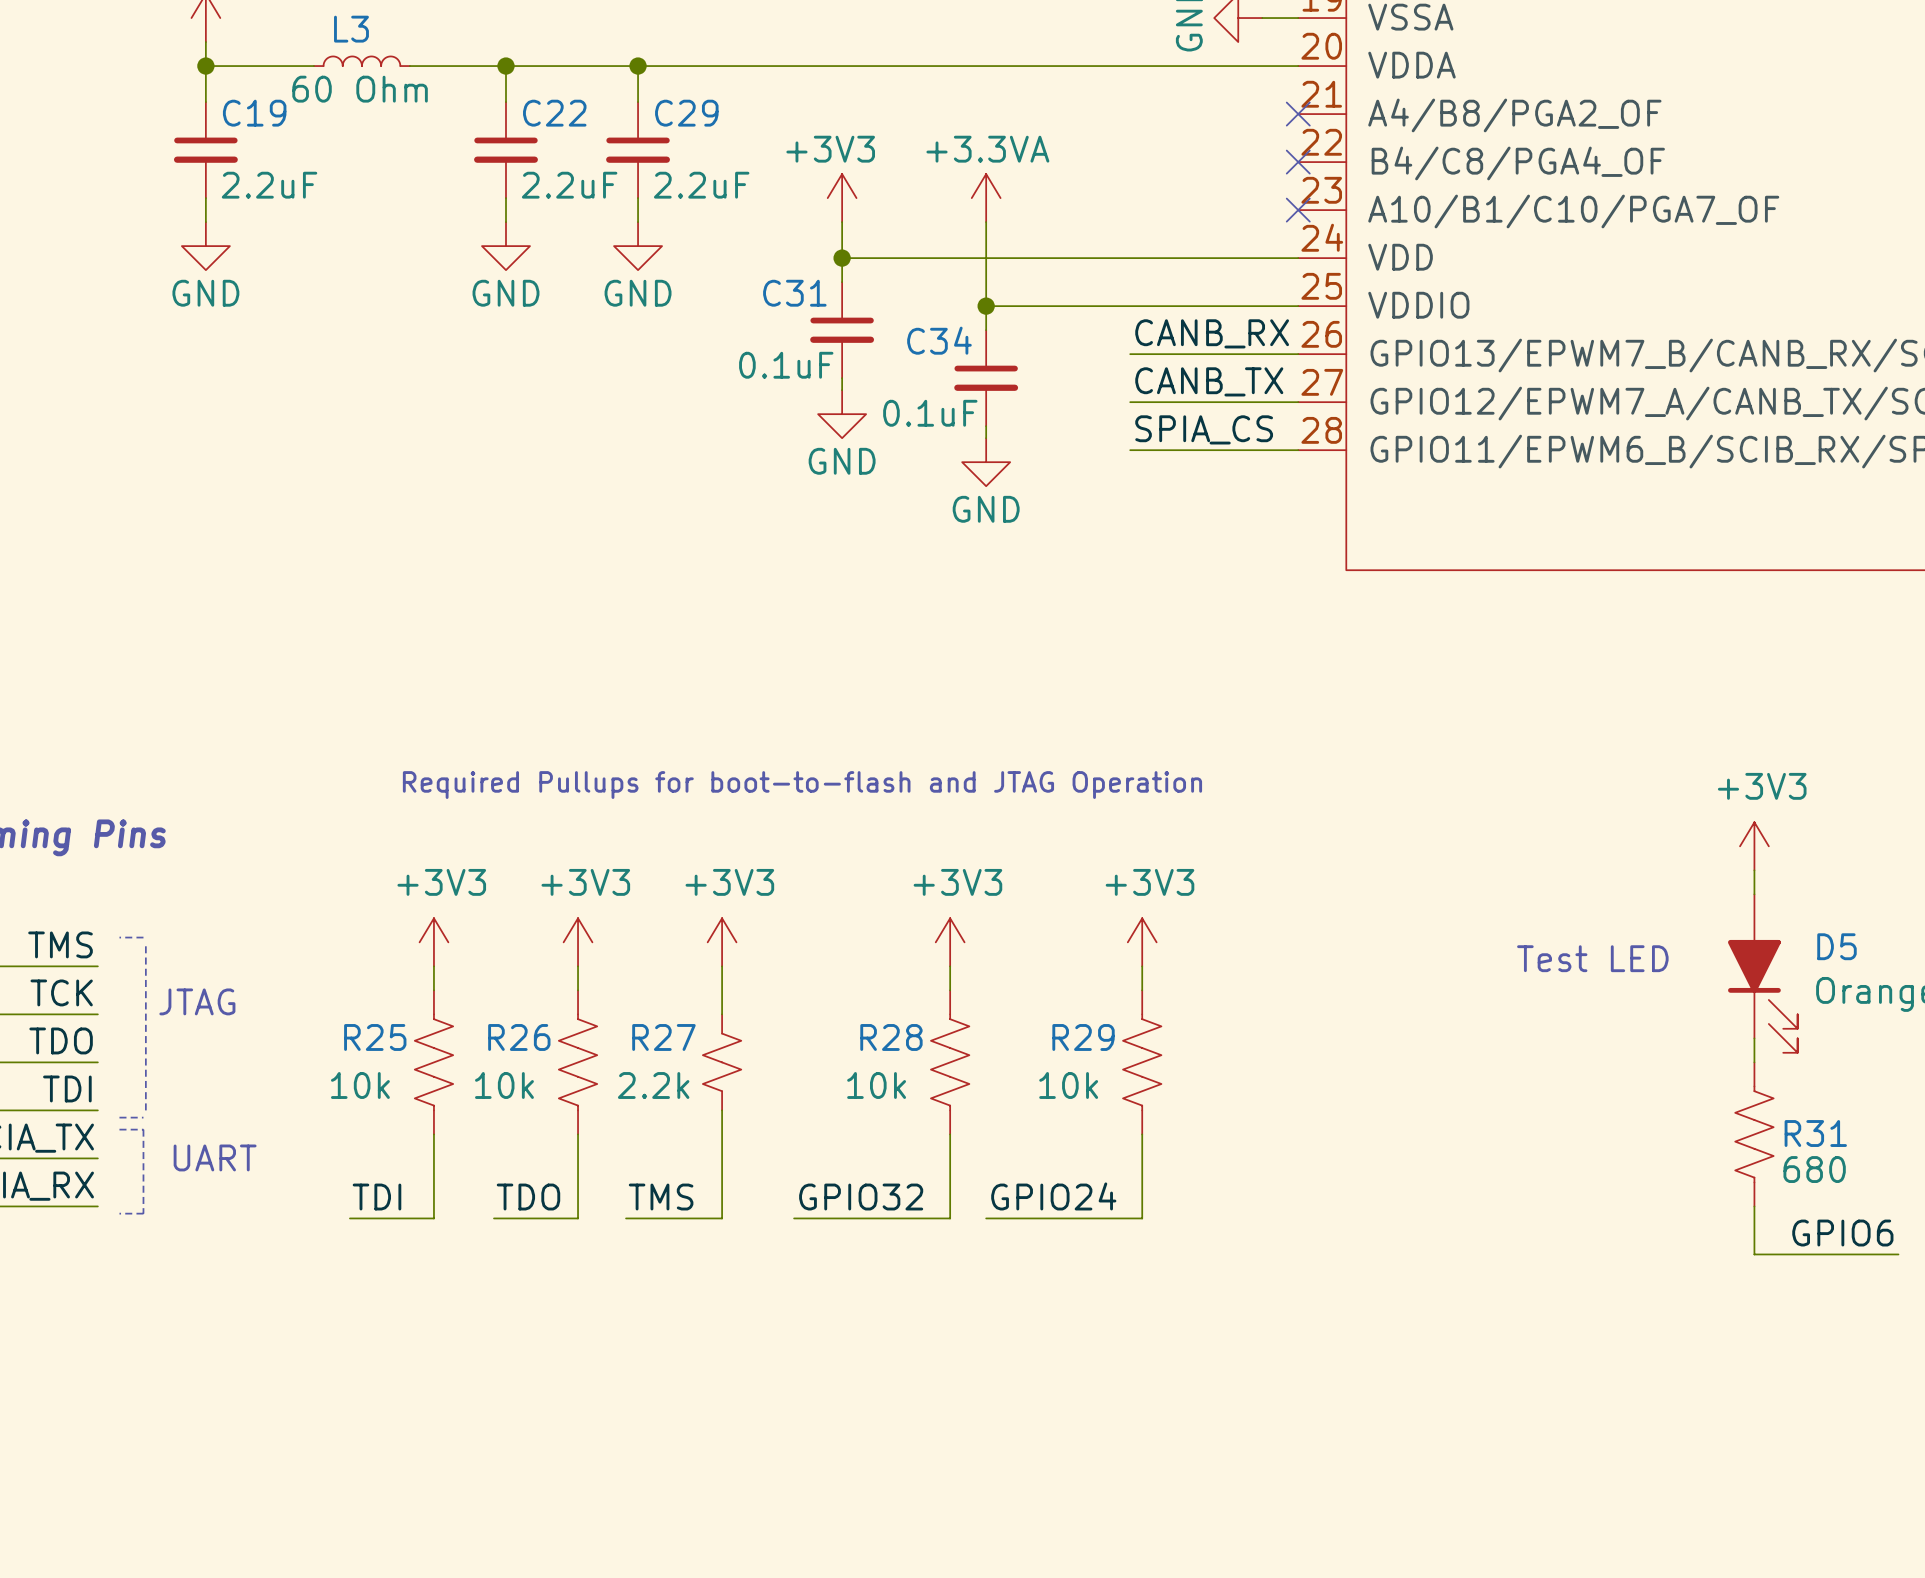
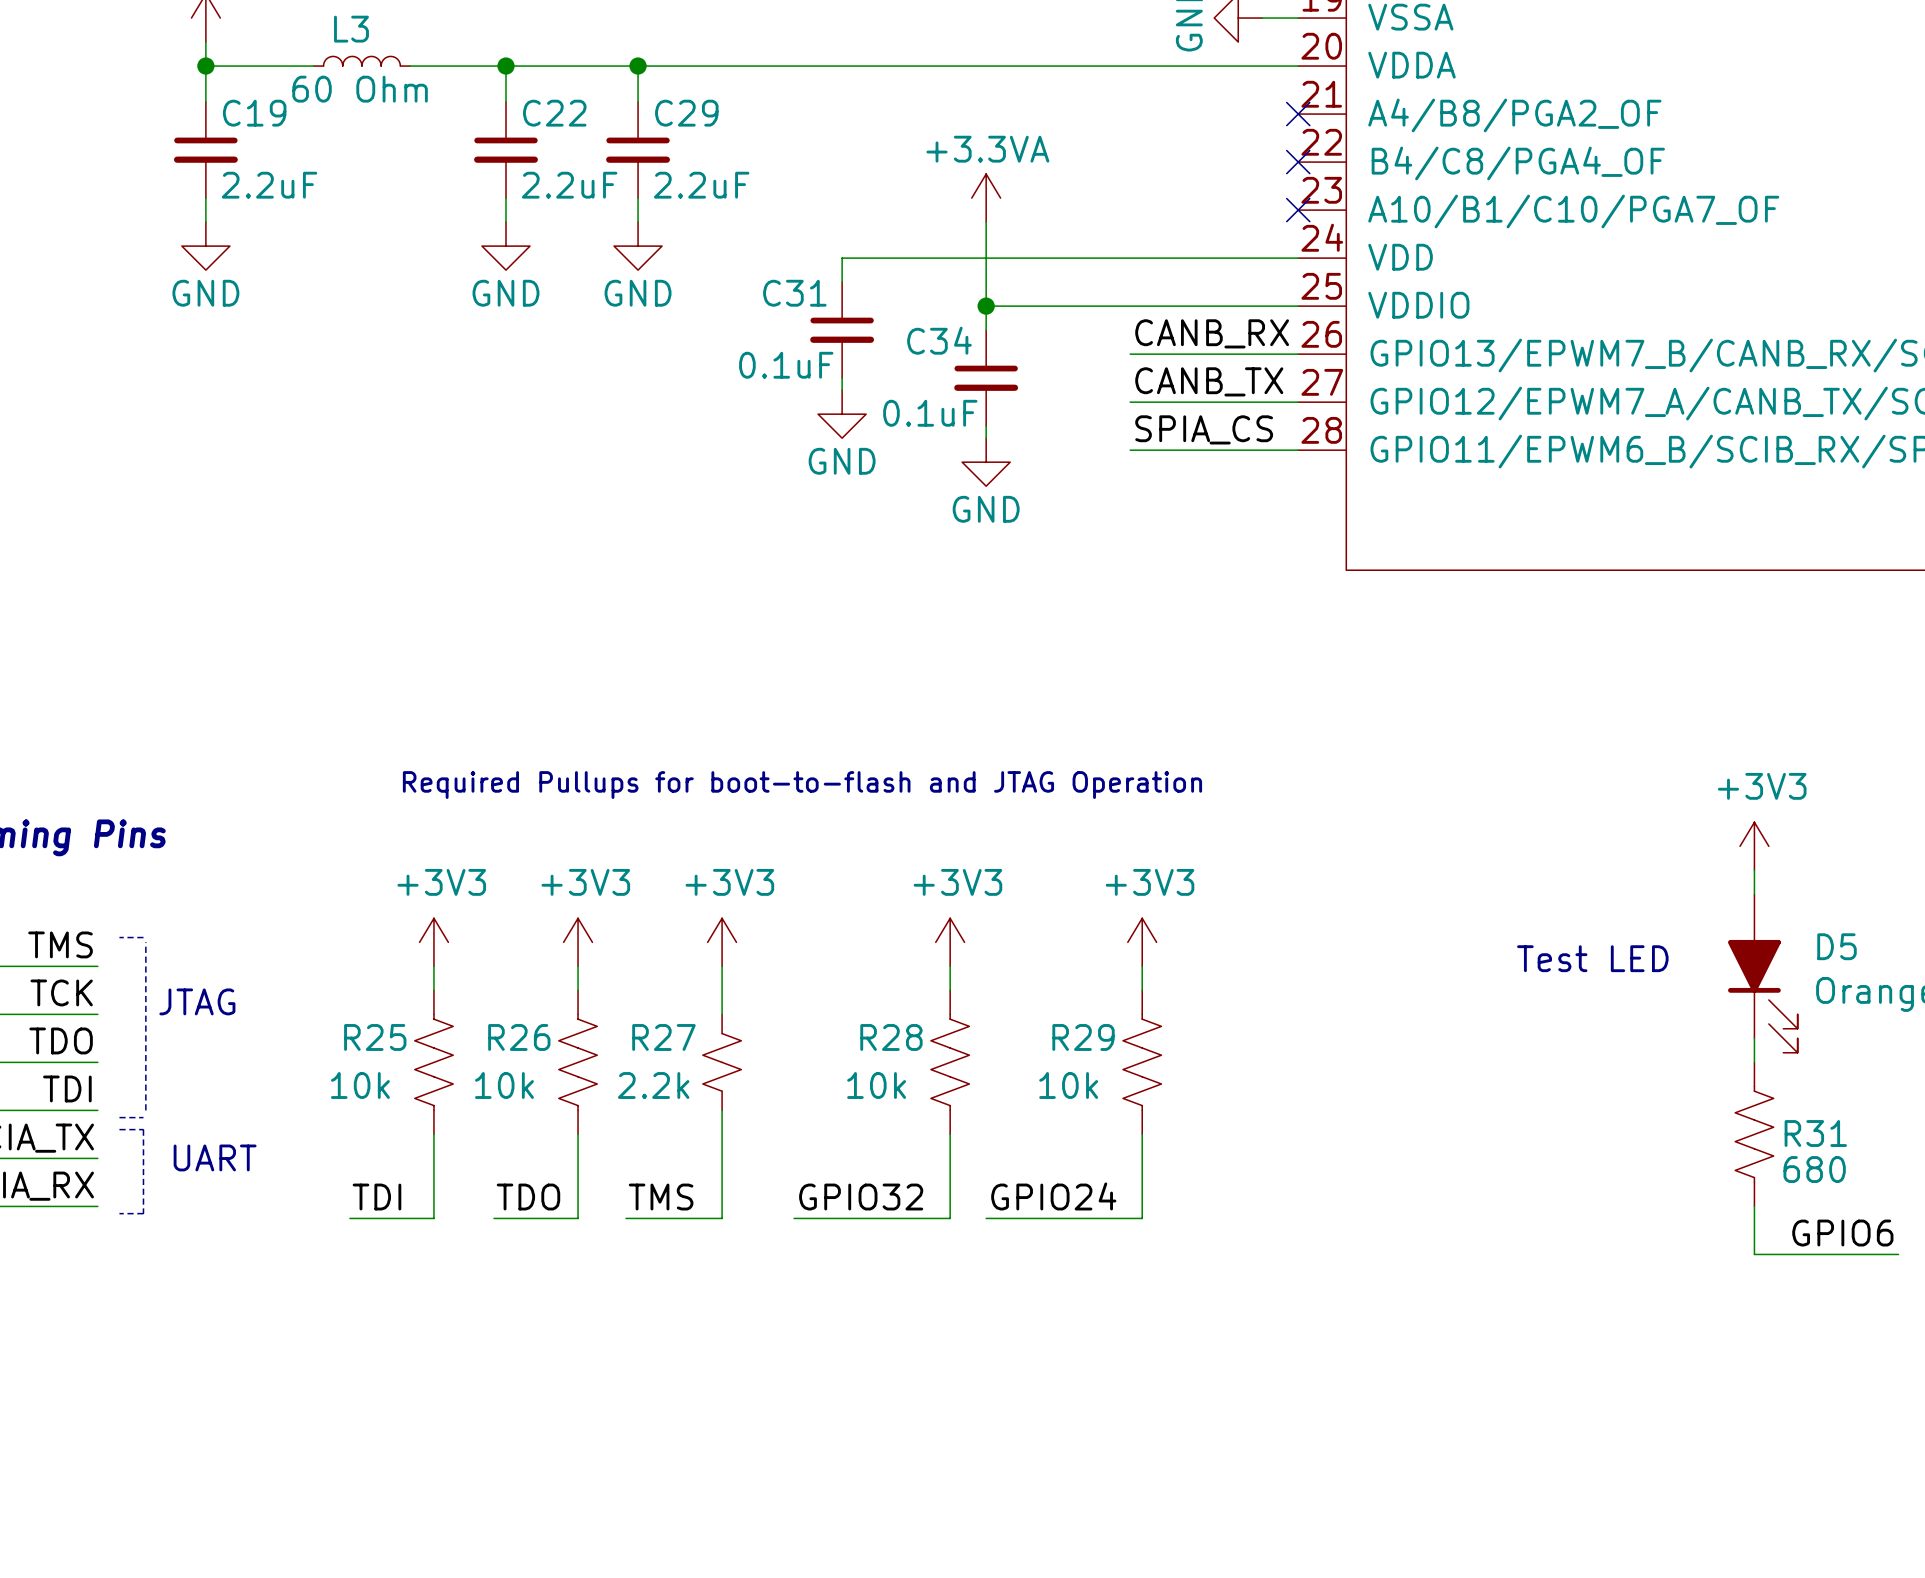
power symbol: +3V3 (842, 198) -> none
wire: (842, 222) (842, 258) -> none
junction: (842, 258) -> none

